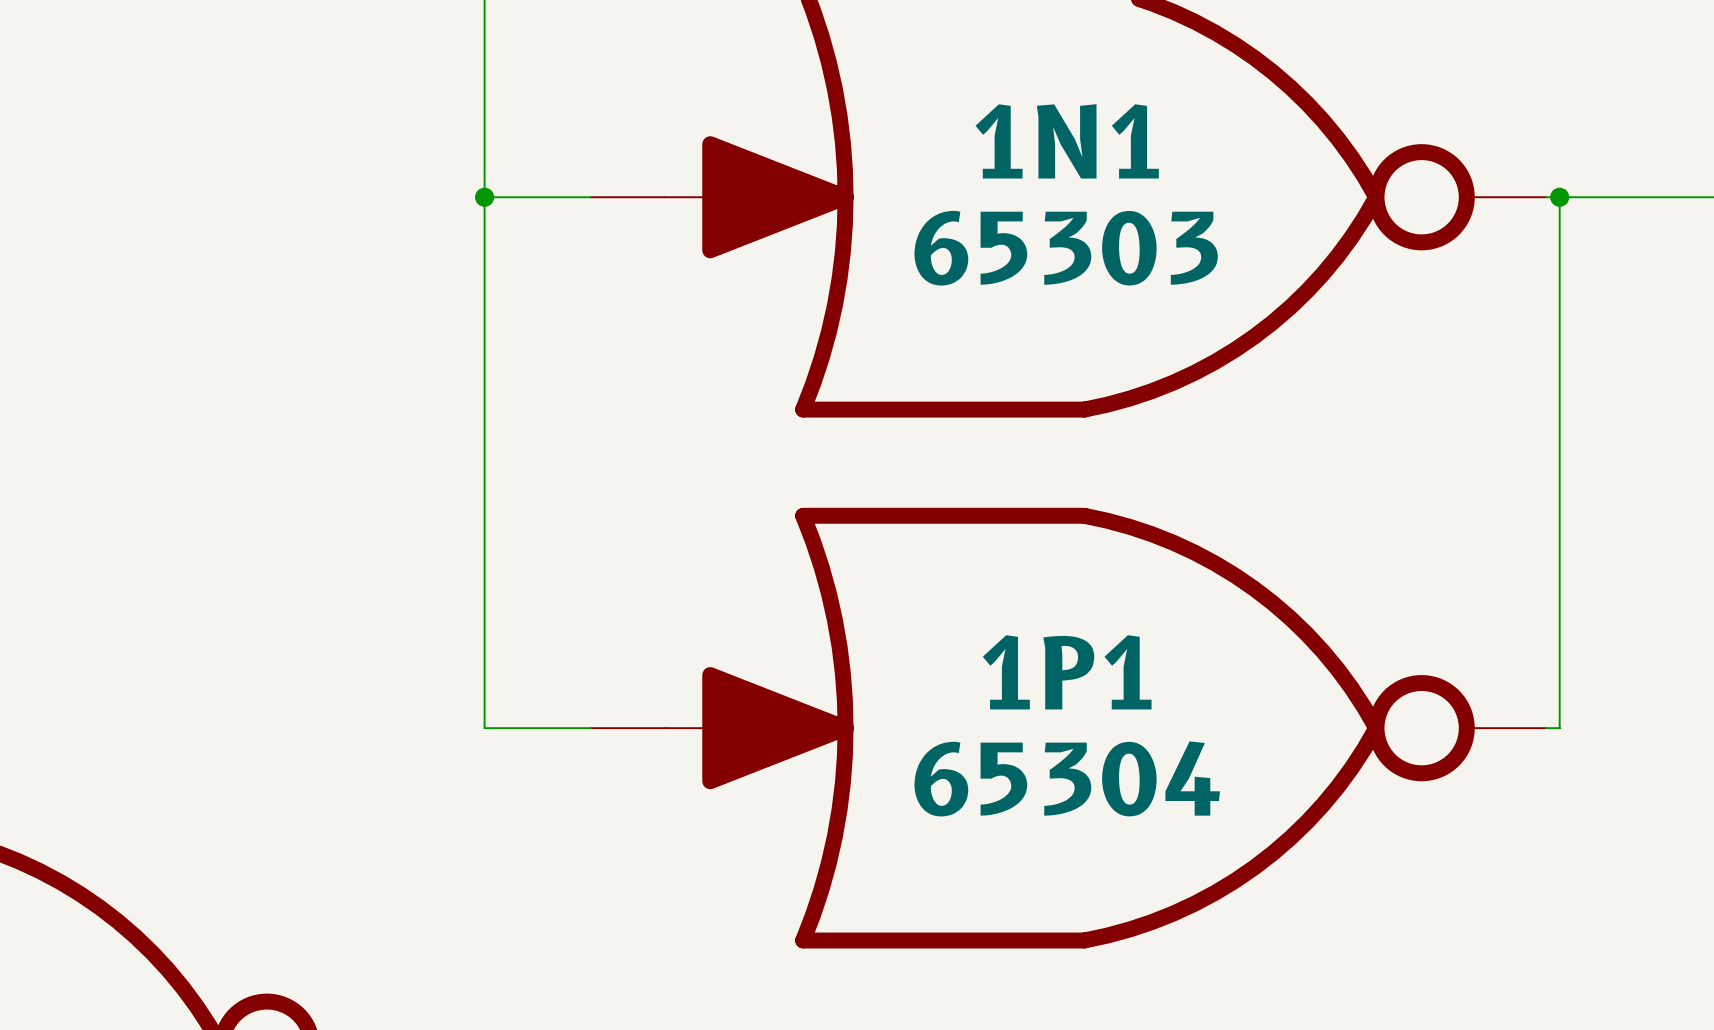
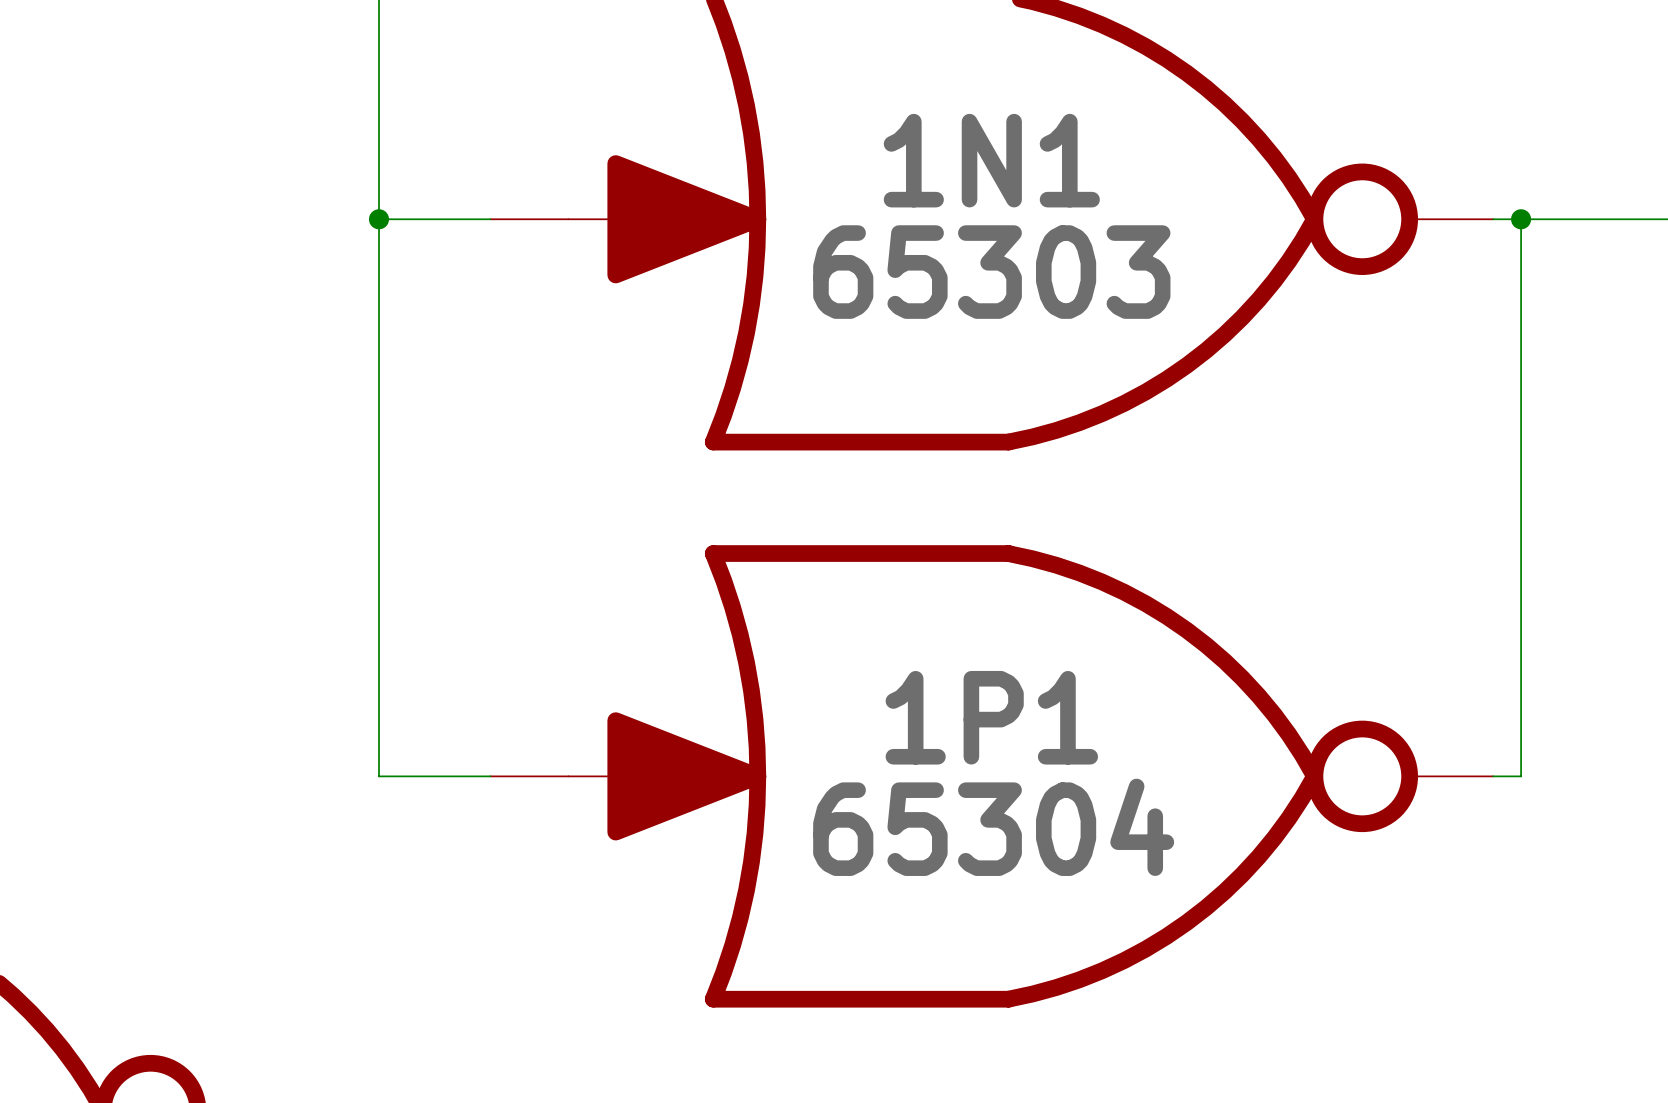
wire: (1559, 197) (1559, 728) -> (1521, 219) (1521, 776) (1507, 776)
junction position: (1559, 197) -> (1521, 219)

